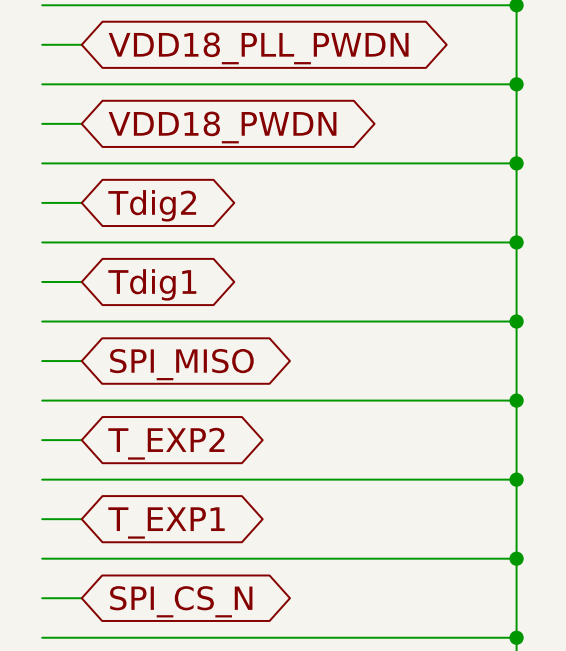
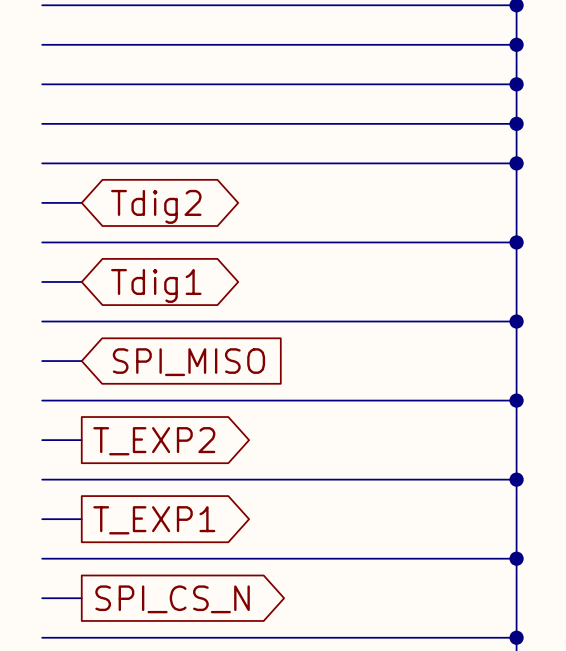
wire: none -> (81, 44) (516, 44)
junction: none -> (516, 44)
global label: VDD18_PLL_PWDN (258, 48) -> none
wire: none -> (81, 123) (516, 123)
junction: none -> (516, 123)
global label: VDD18_PWDN (222, 127) -> none
global label shape: bidirectional (181, 364) -> input (188, 362)
global label shape: bidirectional (166, 443) -> output (154, 441)
global label shape: bidirectional (166, 523) -> output (154, 520)
global label shape: bidirectional (181, 601) -> output (172, 599)

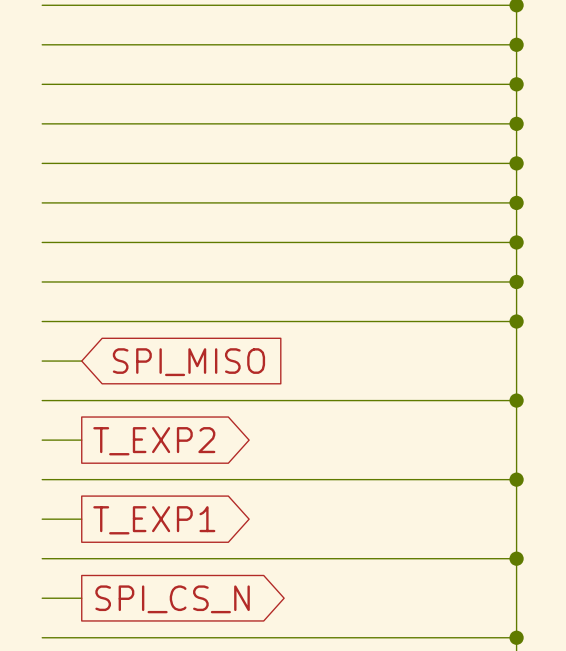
wire: none -> (81, 202) (516, 202)
junction: none -> (516, 202)
global label: Tdig2 (156, 206) -> none
wire: none -> (81, 281) (516, 281)
junction: none -> (516, 281)
global label: Tdig1 (156, 285) -> none

